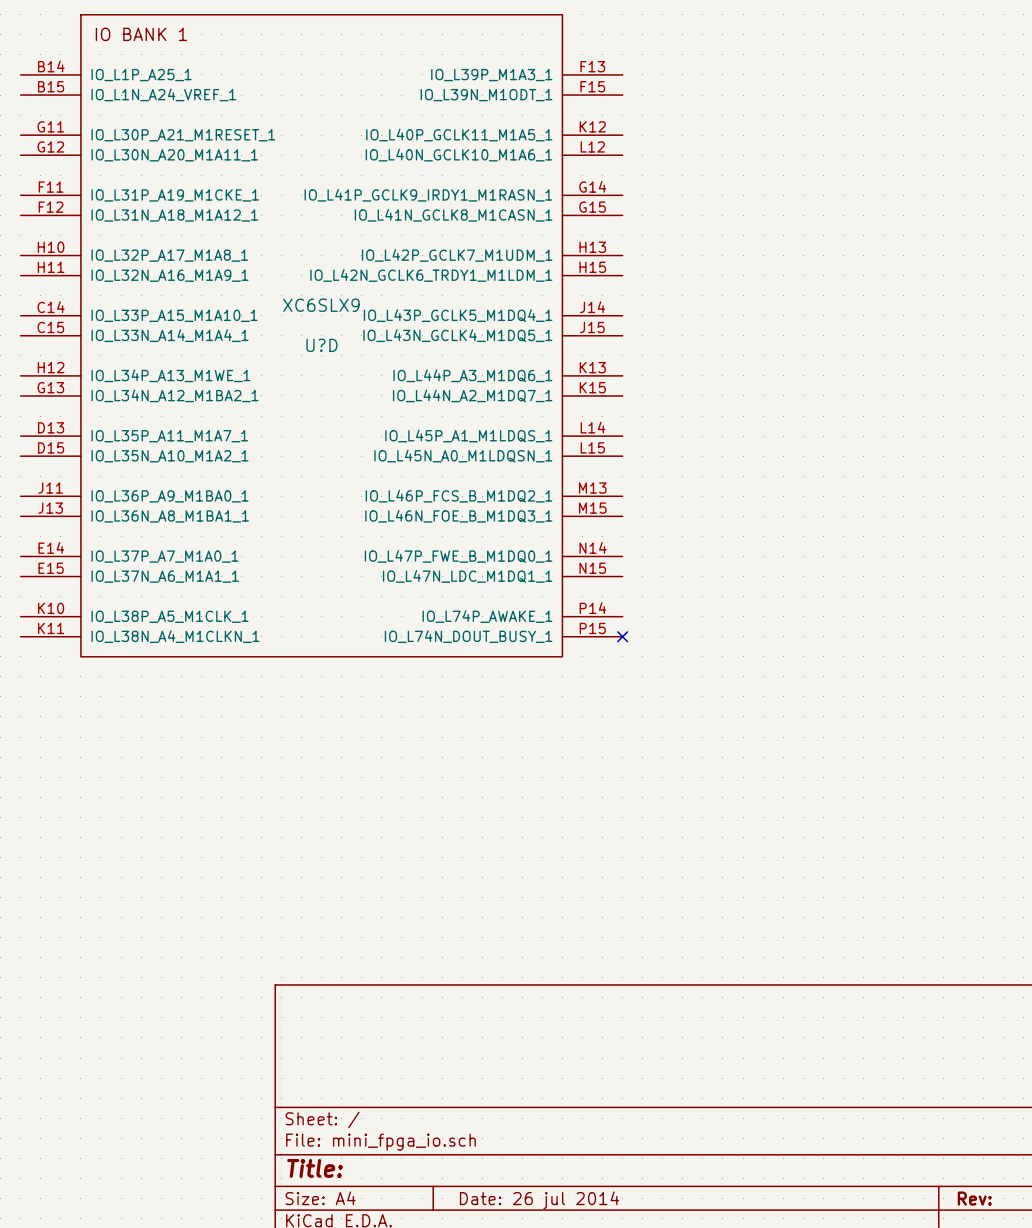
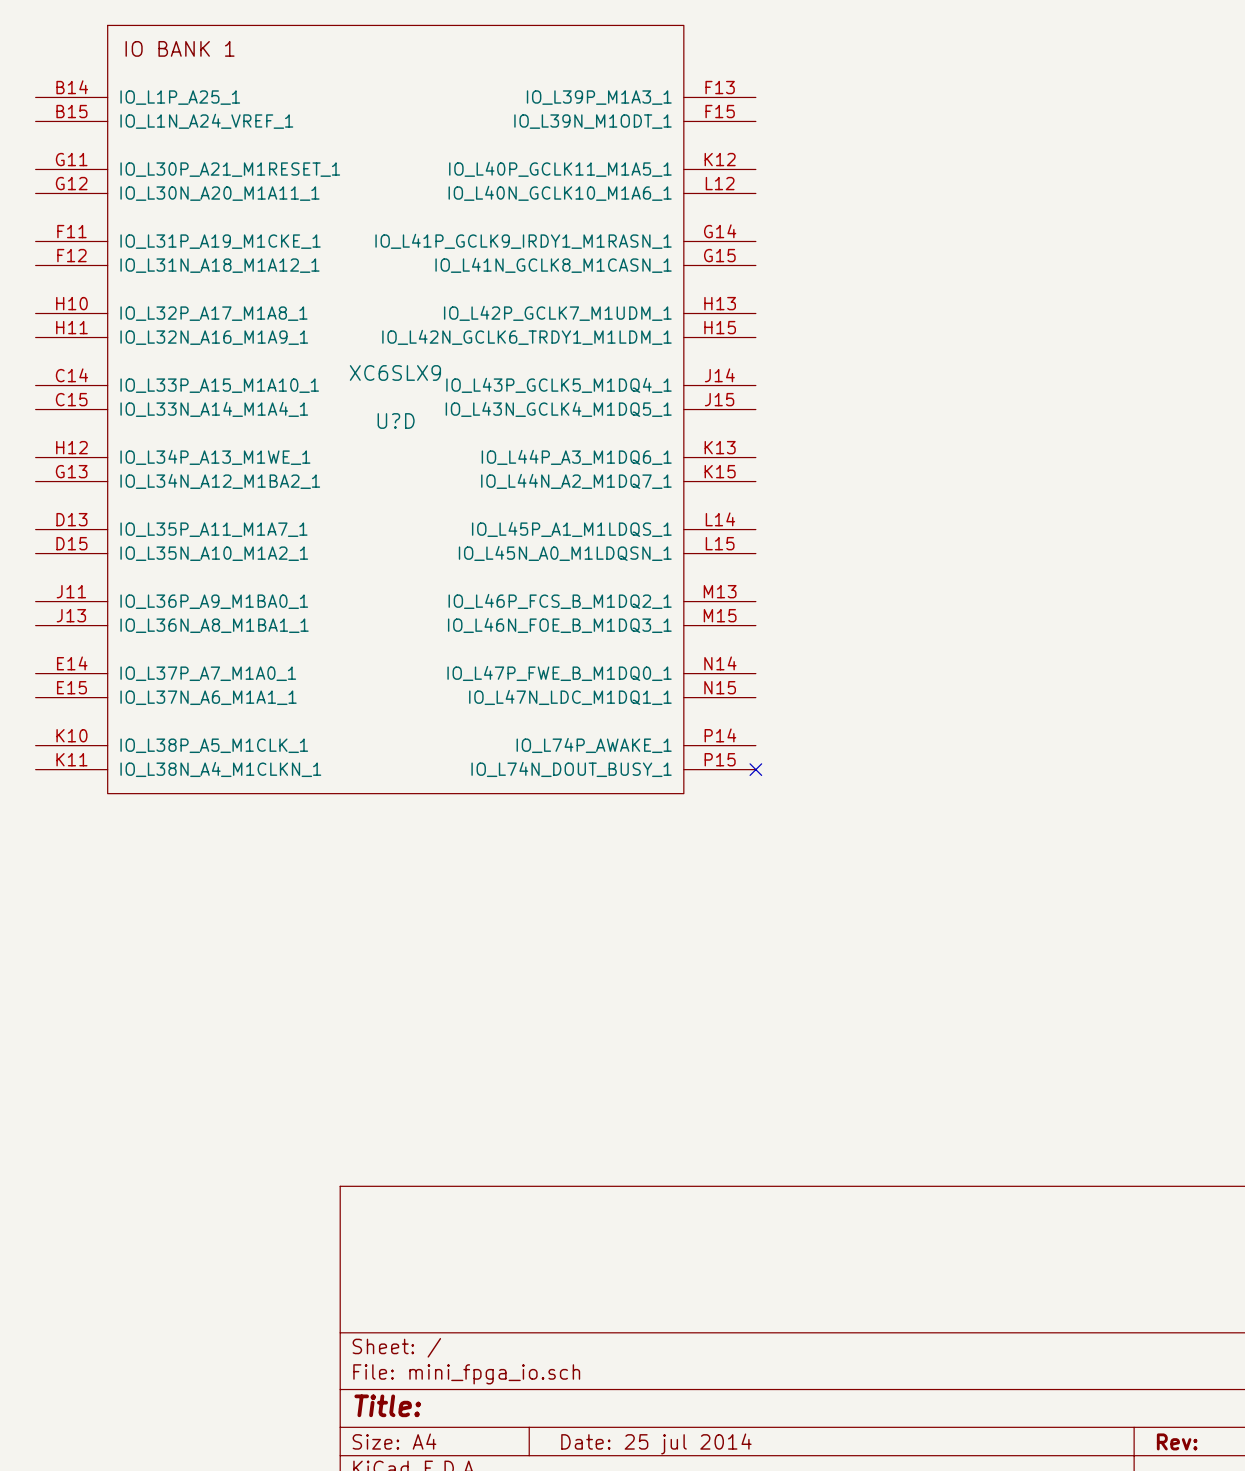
title block: Date: 26 jul 2014 (539, 1200) -> Date: 25 jul 2014 (656, 1443)

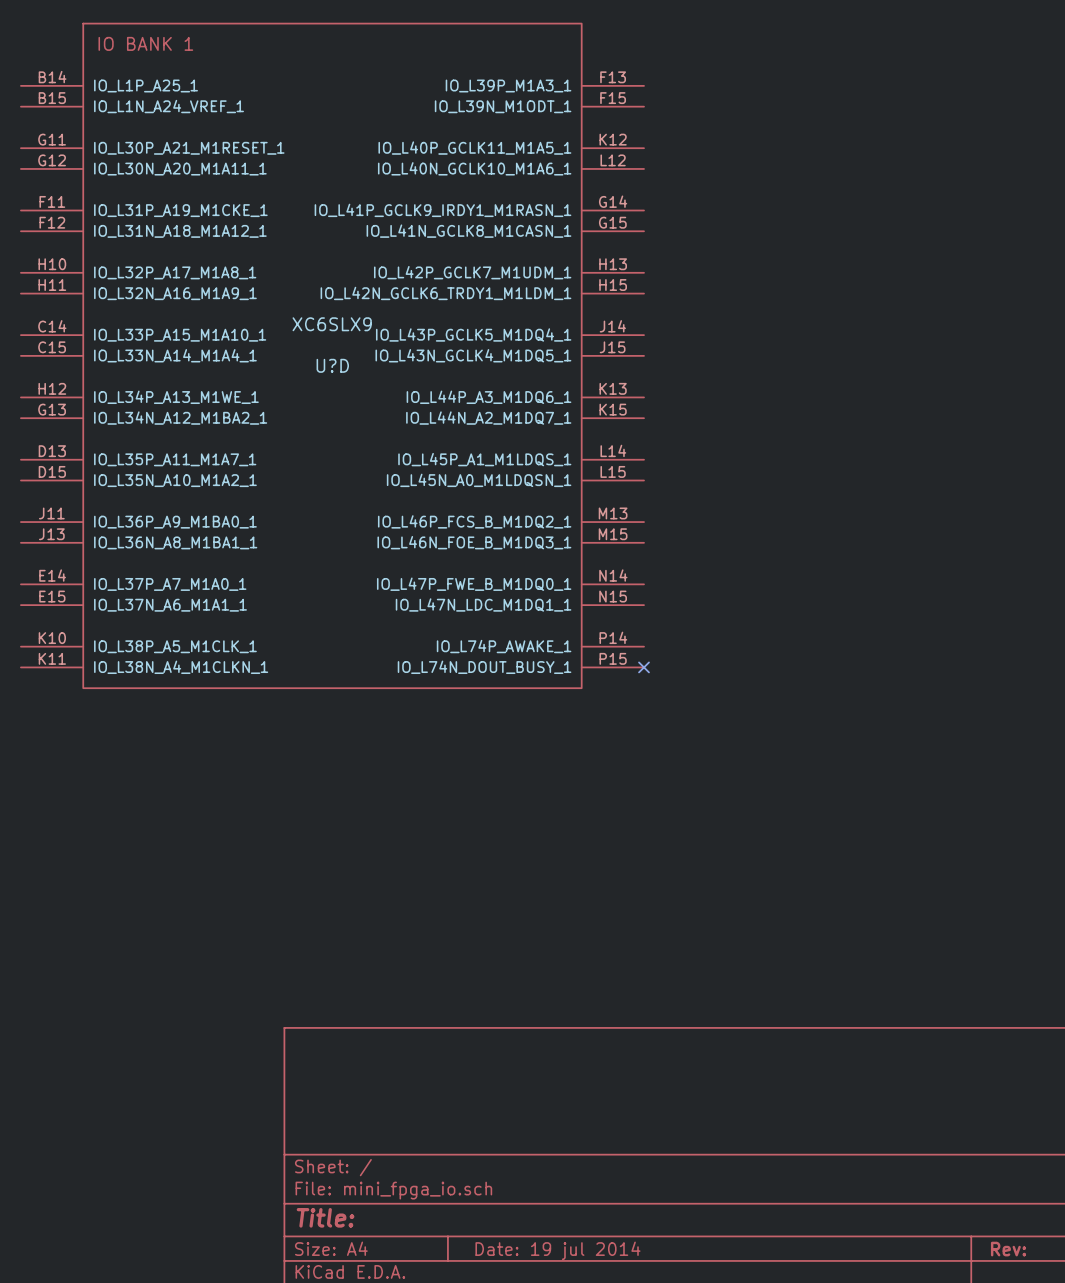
title block: Date: 25 jul 2014 (656, 1443) -> Date: 19 jul 2014 (557, 1250)

